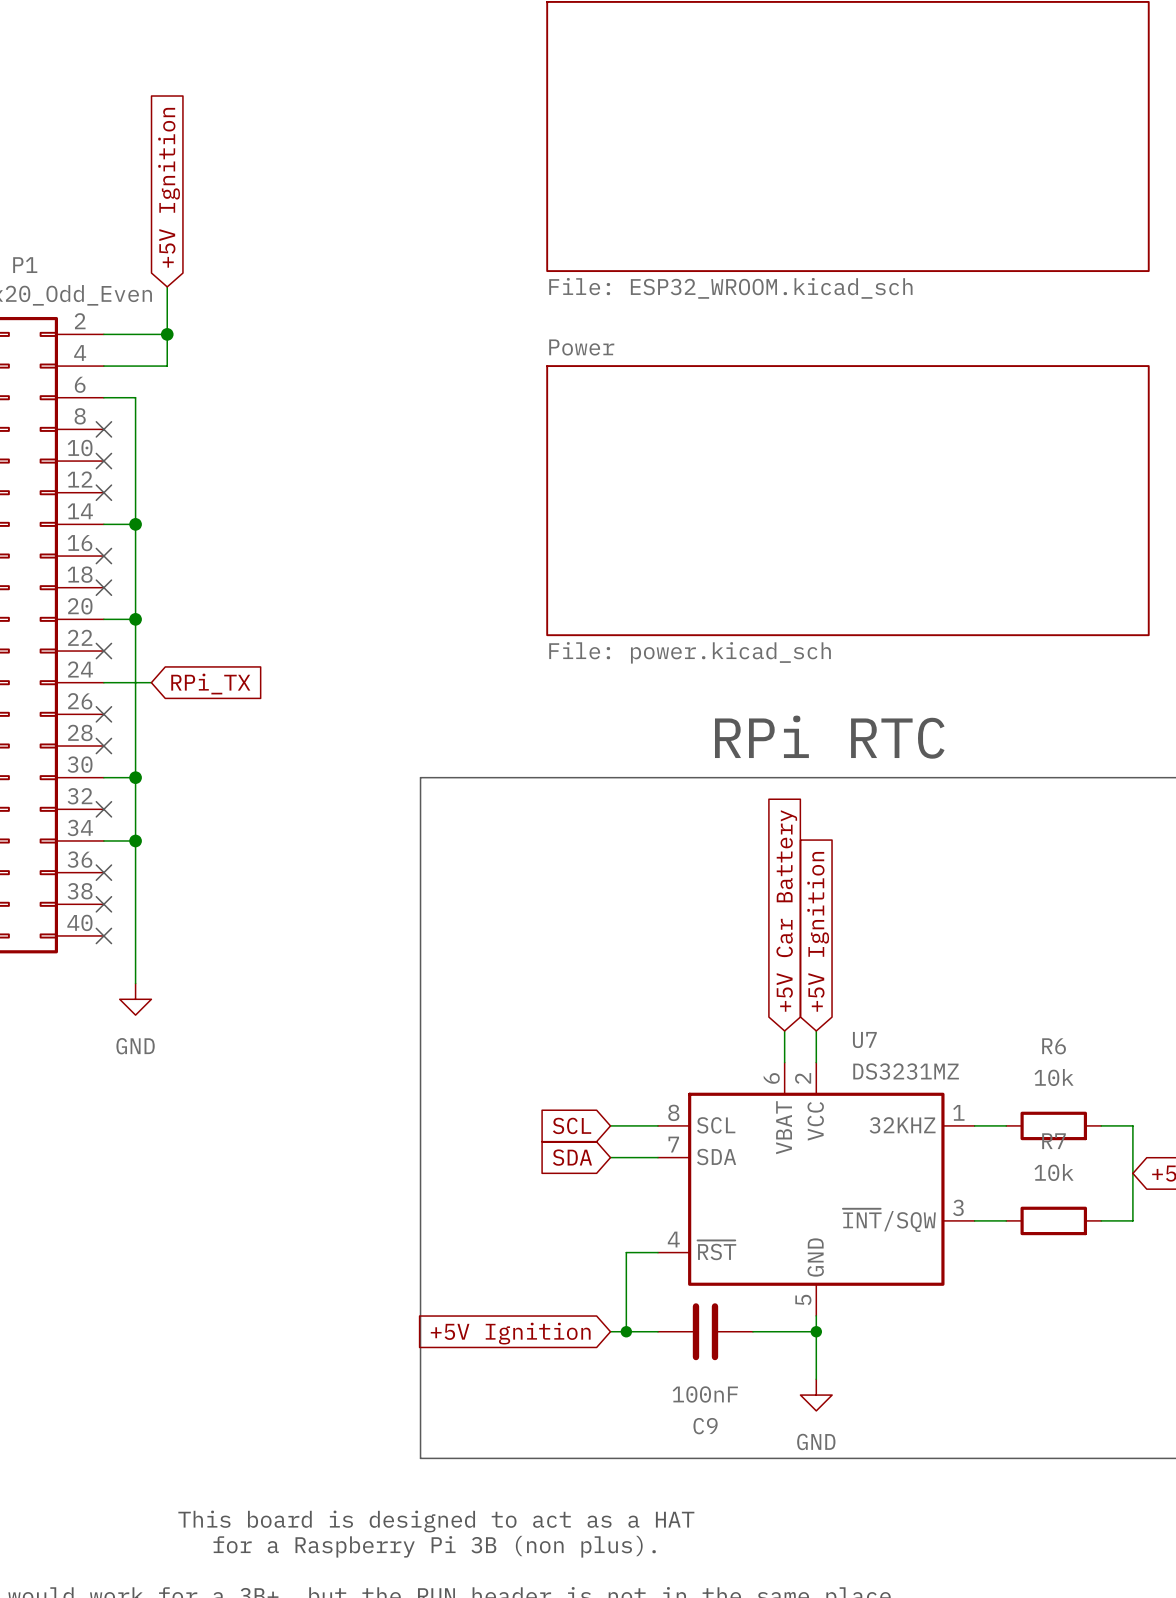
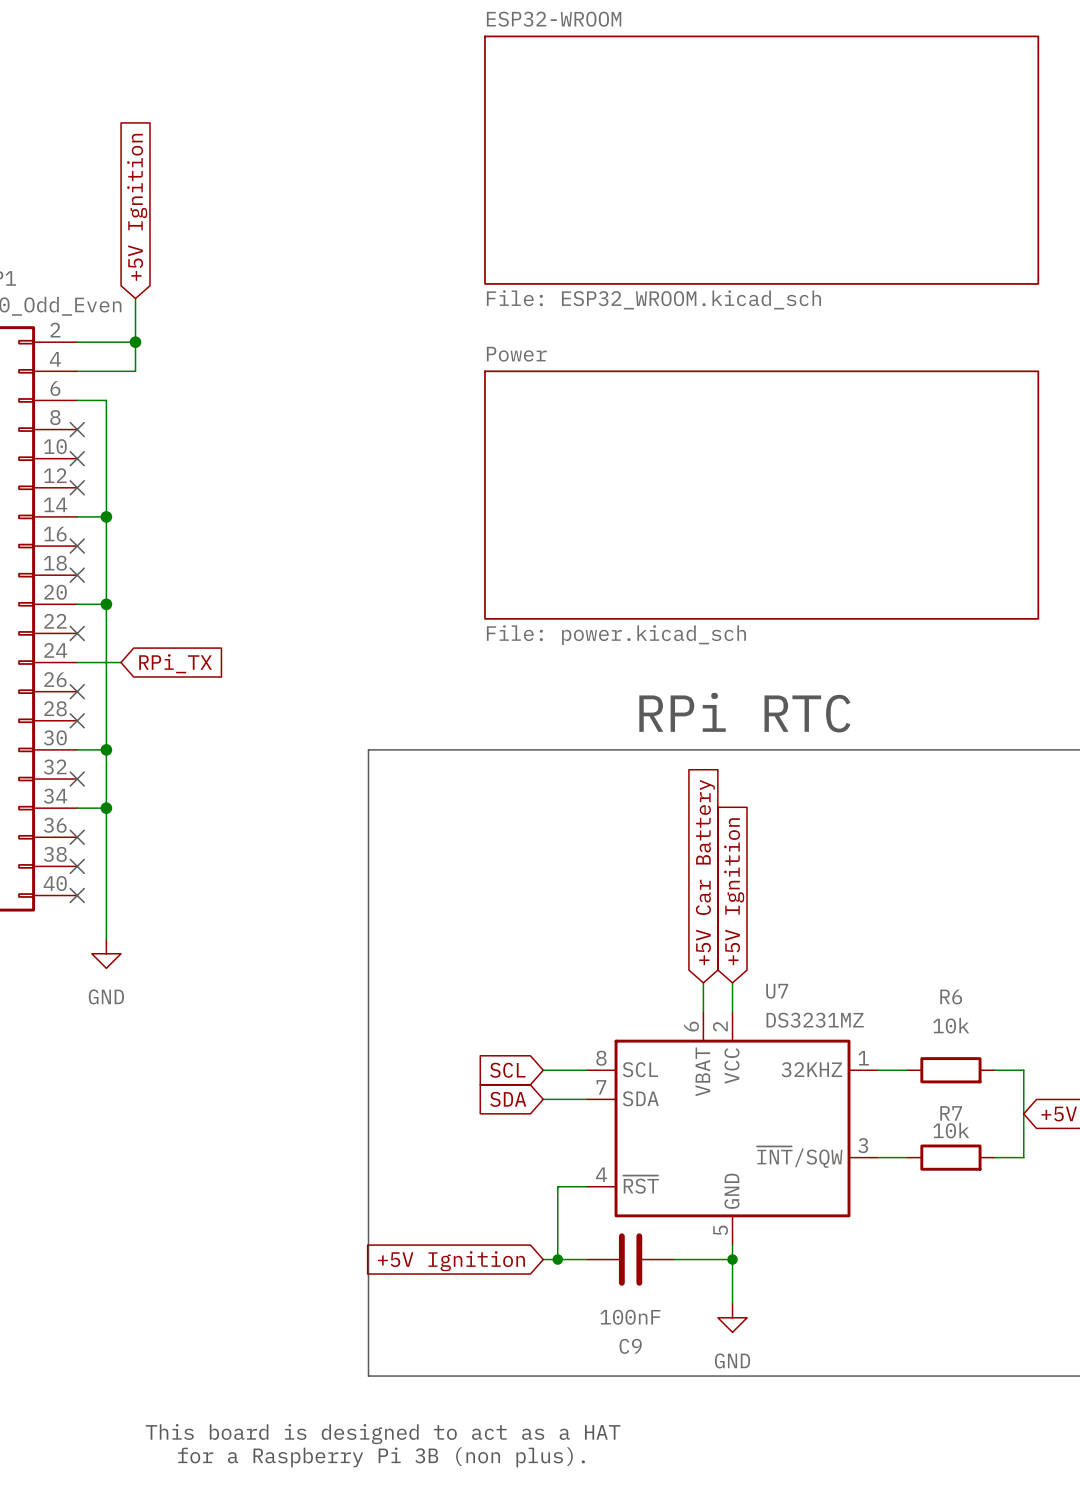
R7 name position: R7 (1054, 1141) -> R7 (951, 1113)
R7 value position: 10k (1054, 1172) -> 10k (951, 1130)

